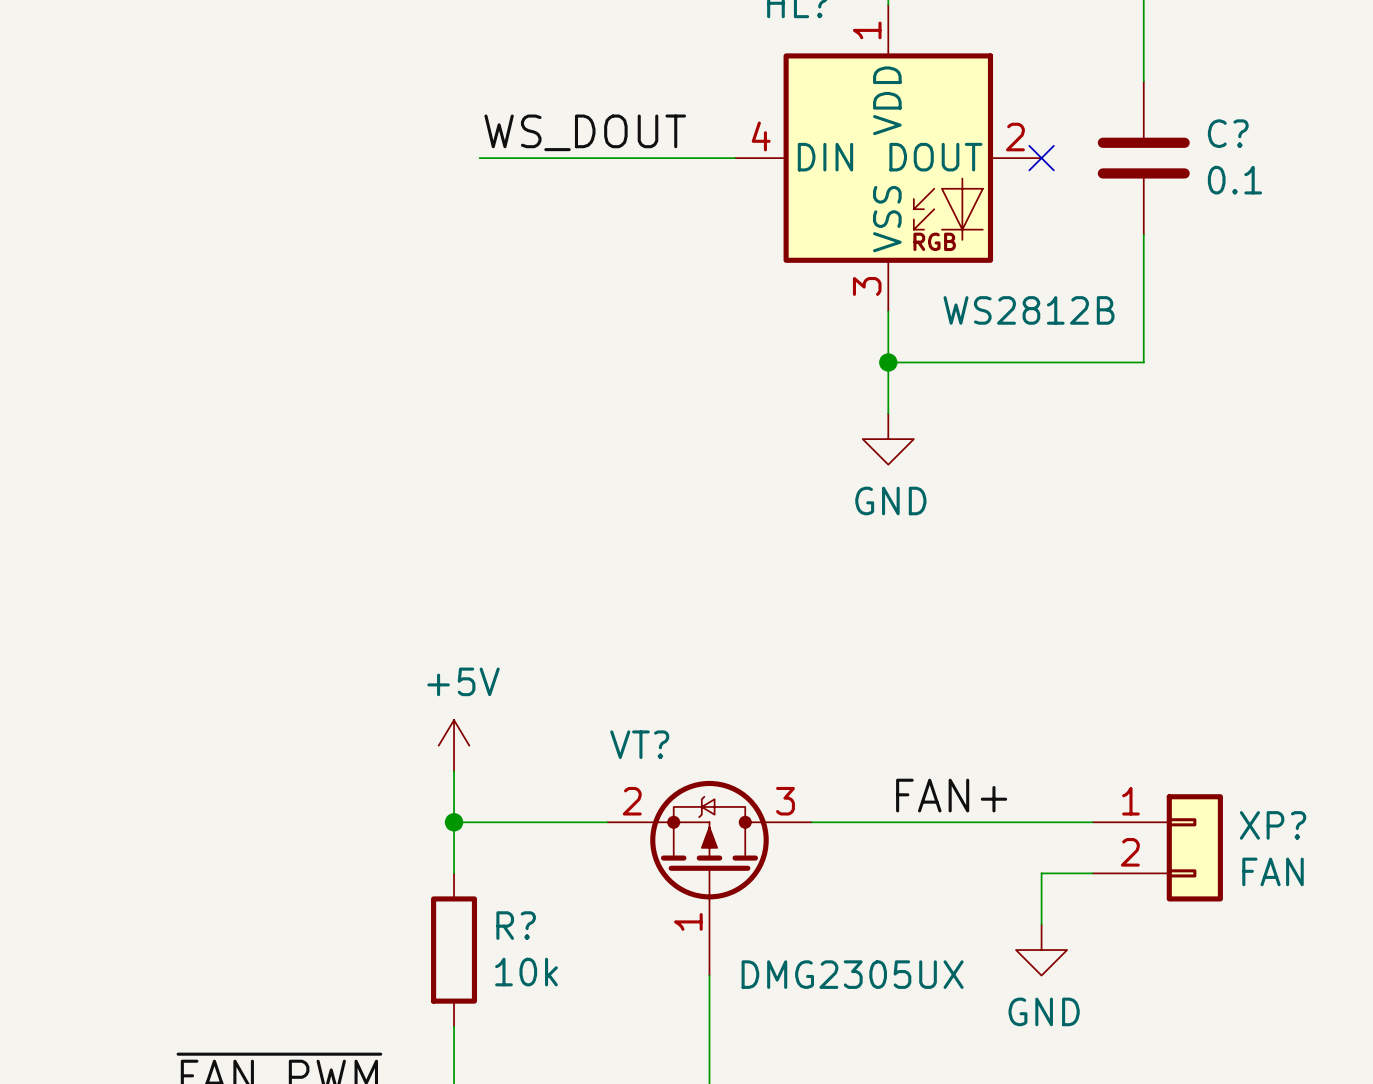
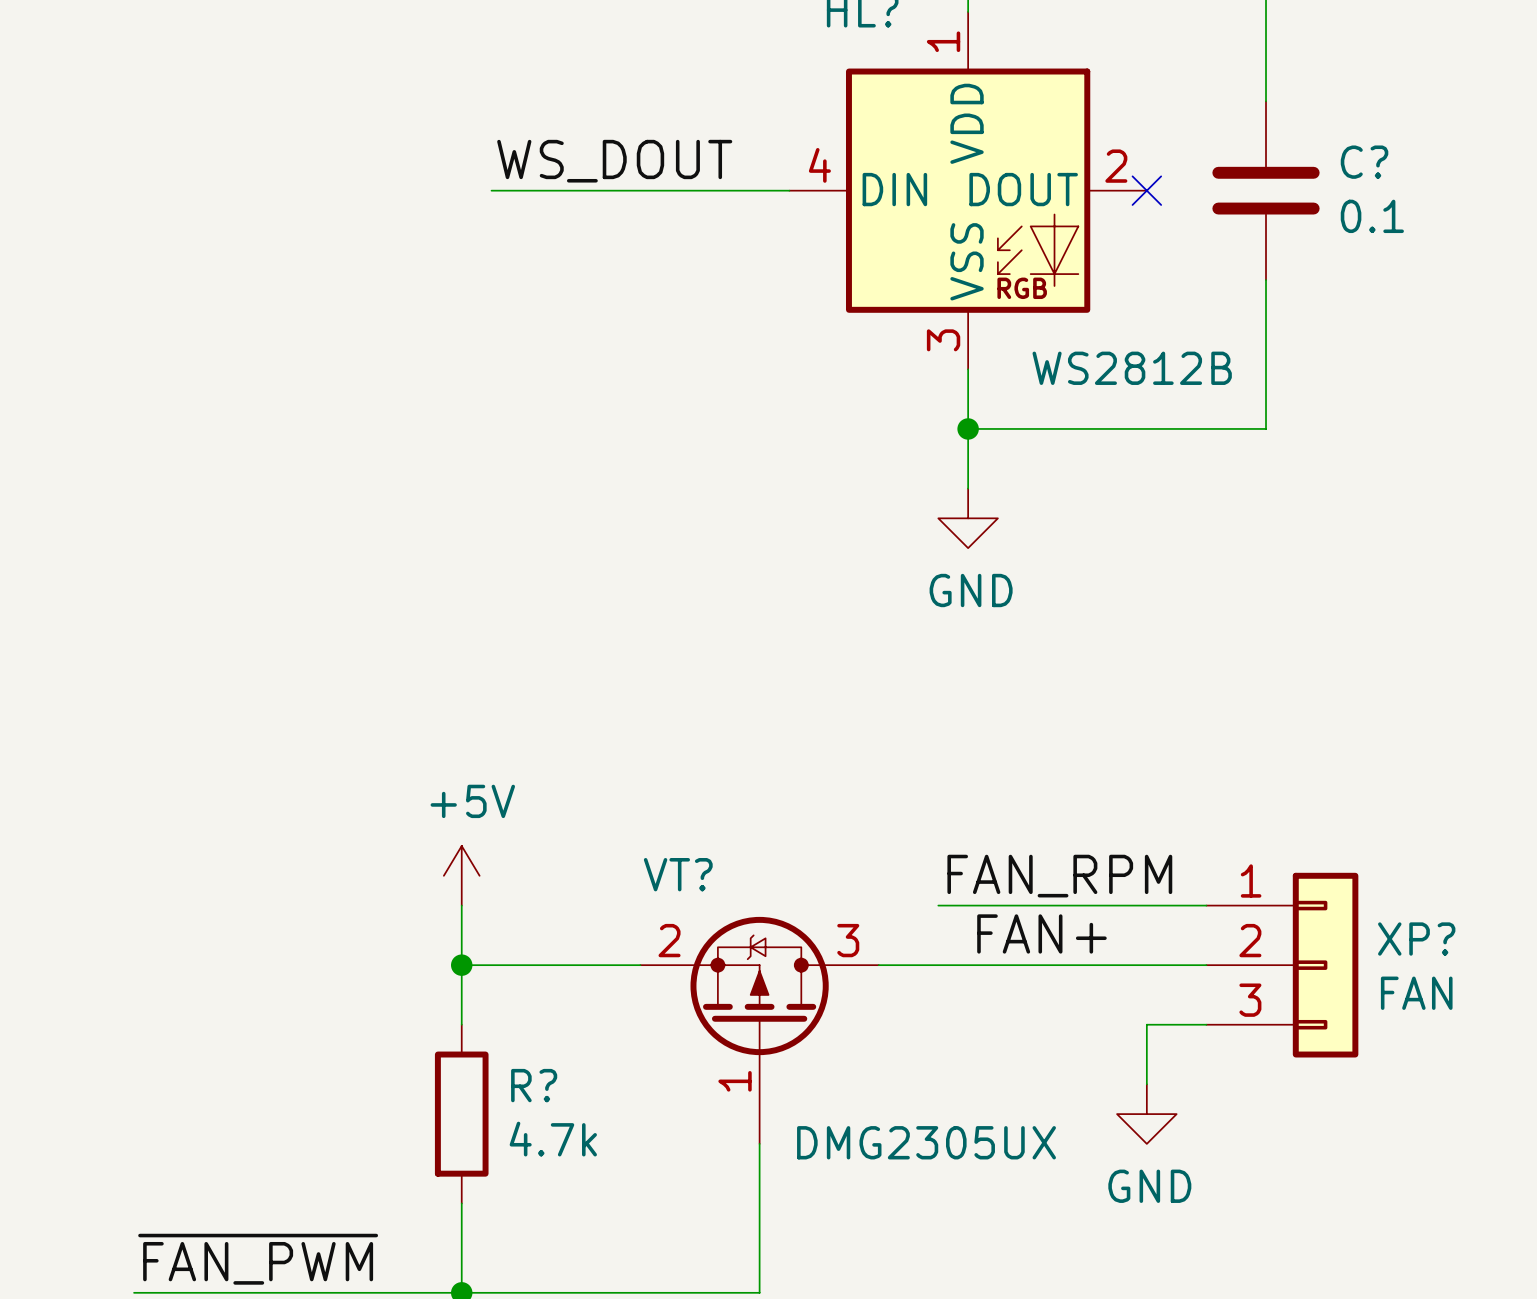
label: none -> FAN_RPM (1059, 876)
wire: none -> (938, 905) (1206, 905)
XP?: none -> FAN (1282, 965)
XP?: FAN (1157, 847) -> none
R? value: 10k (526, 972) -> 4.7k (553, 1139)

